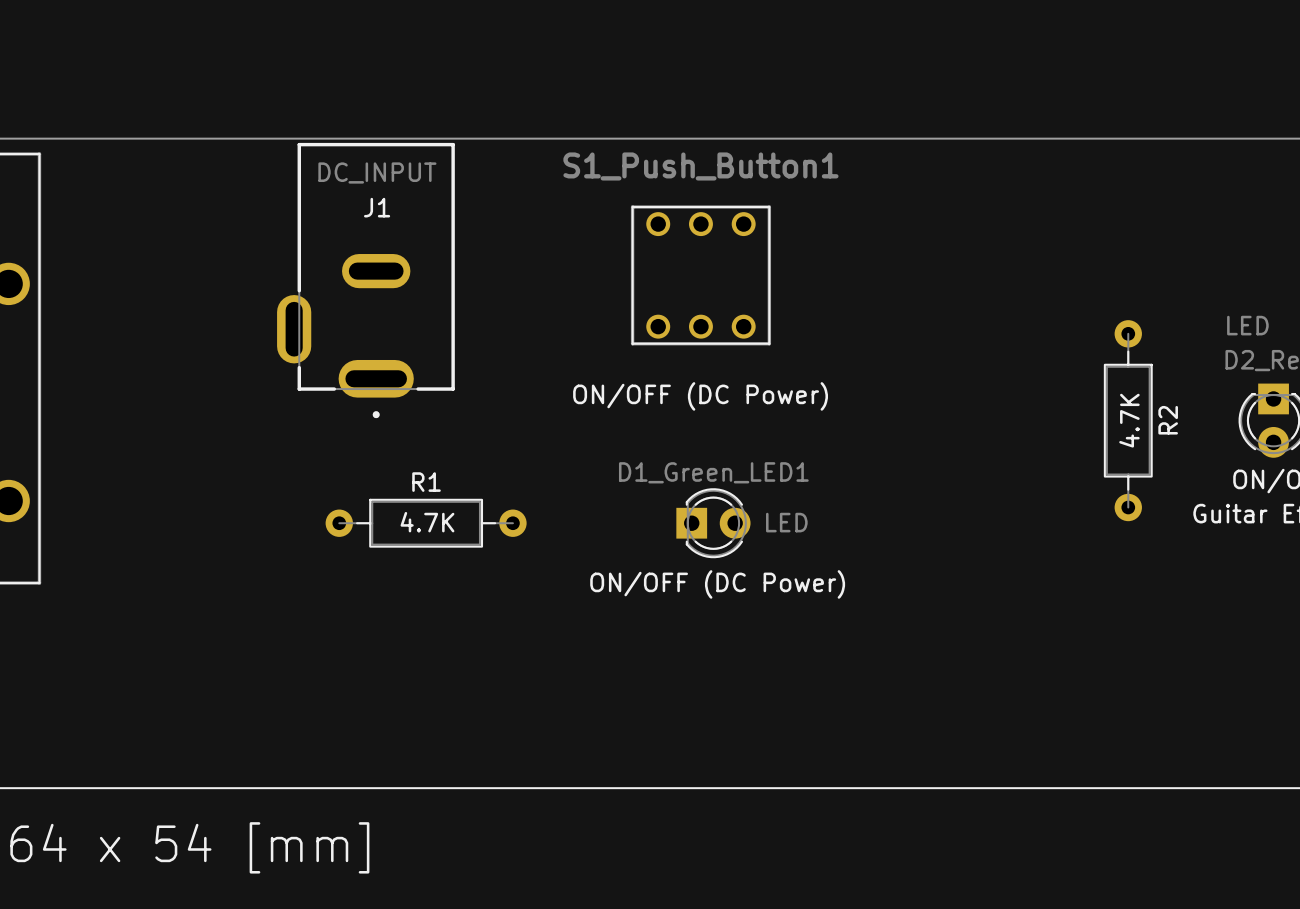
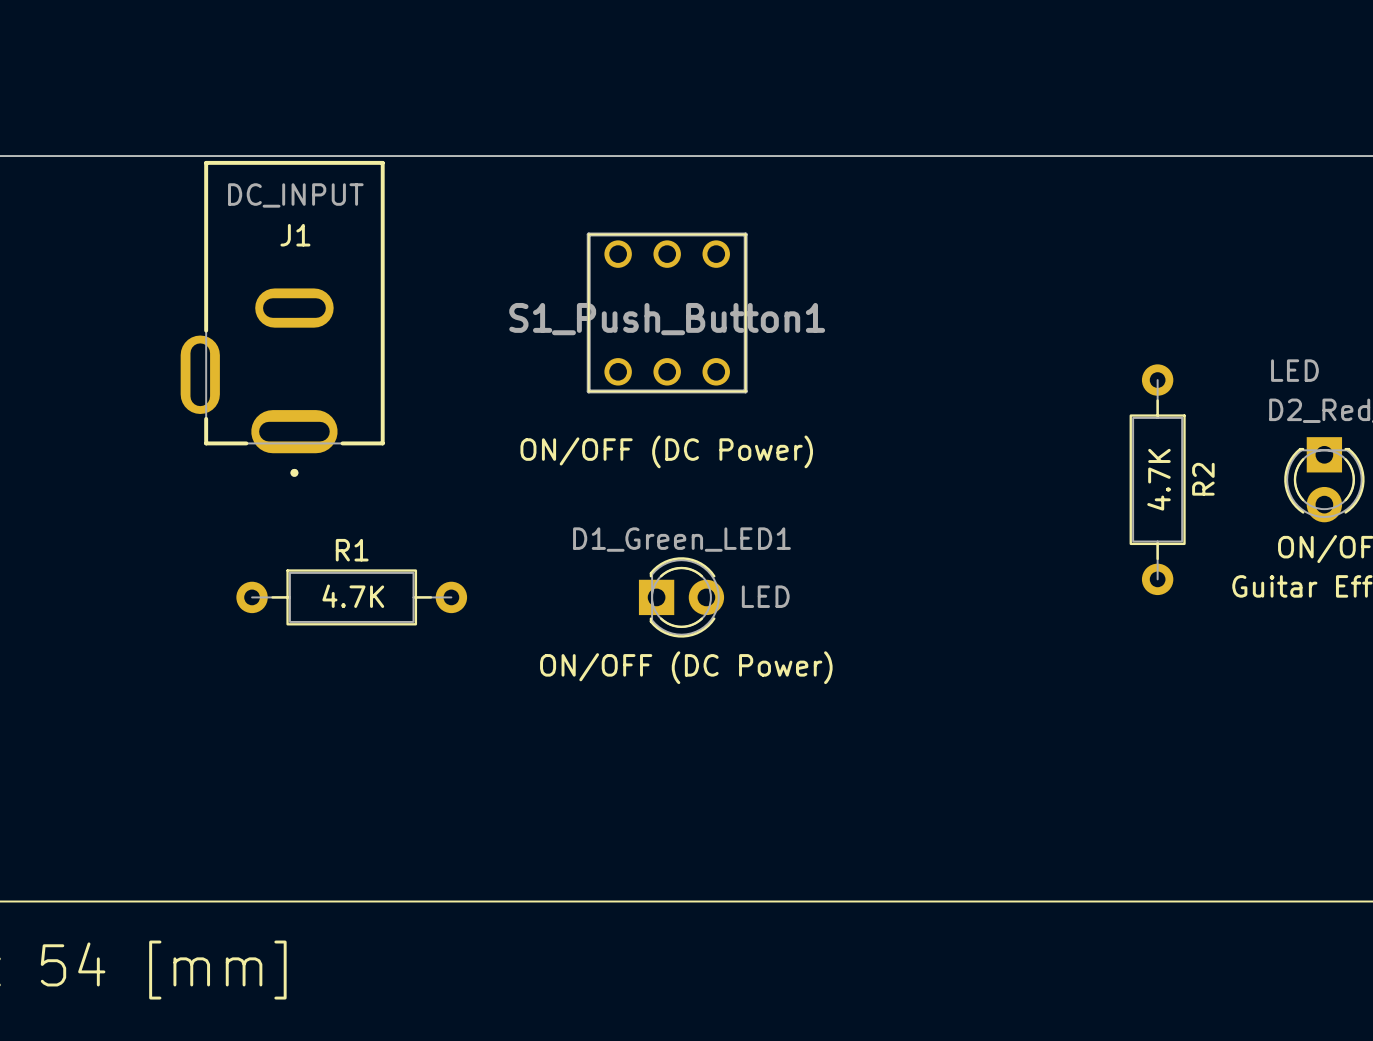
S1_Push_Button1 name position: S1_Push_Button1 (700, 166) -> S1_Push_Button1 (667, 319)

